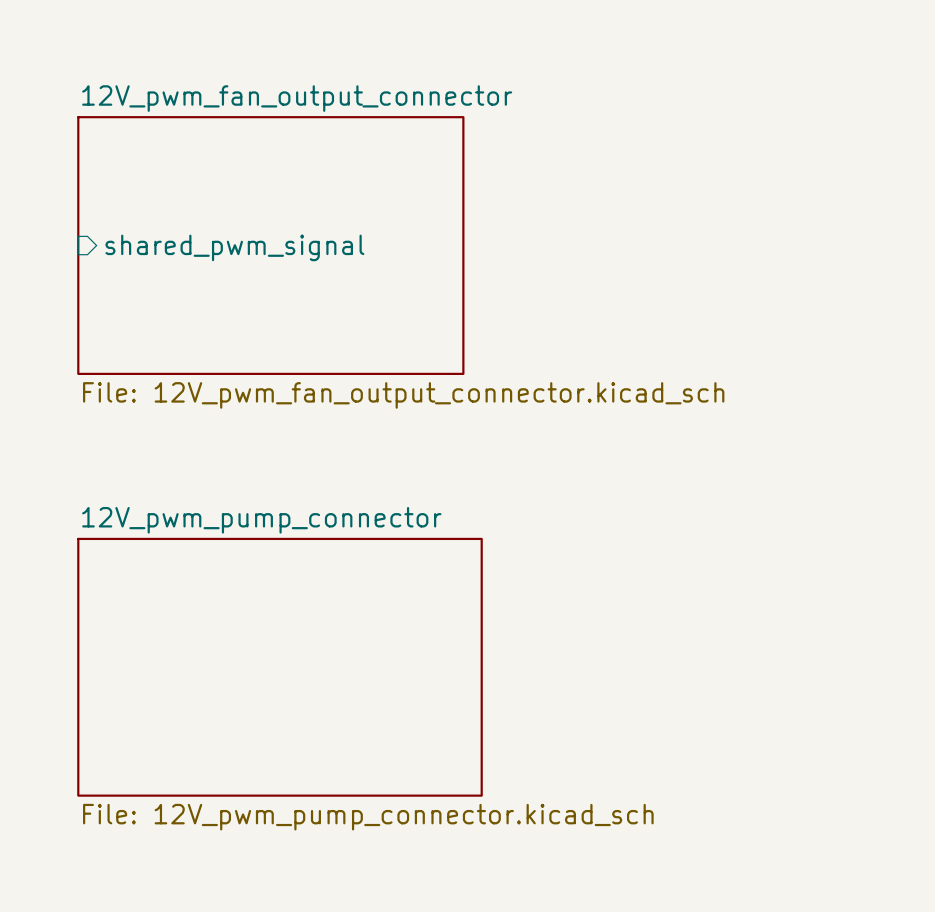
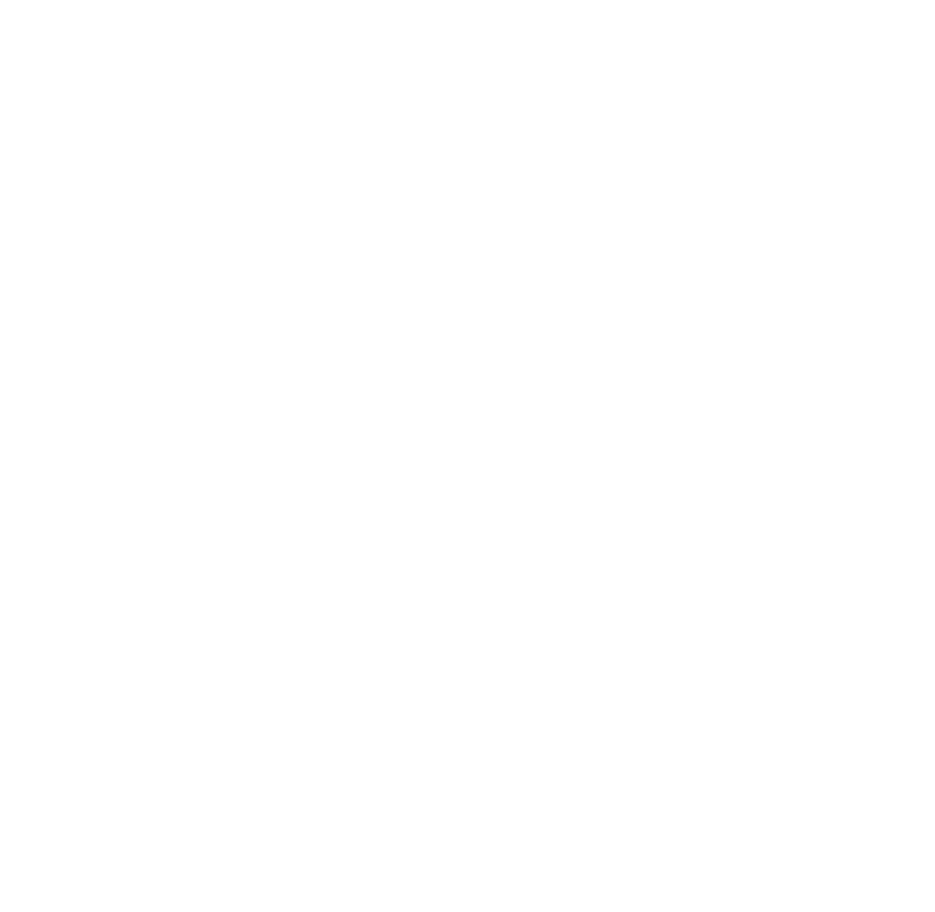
sheet 12V_pwm_fan_output_connector: File: 12V_pwm_fan_output_connector.kicad_sch (270, 245) -> none
sheet pin: shared_pwm_signal (234, 247) -> none
sheet 12V_pwm_pump_connector: File: 12V_pwm_pump_connector.kicad_sch (280, 667) -> none

